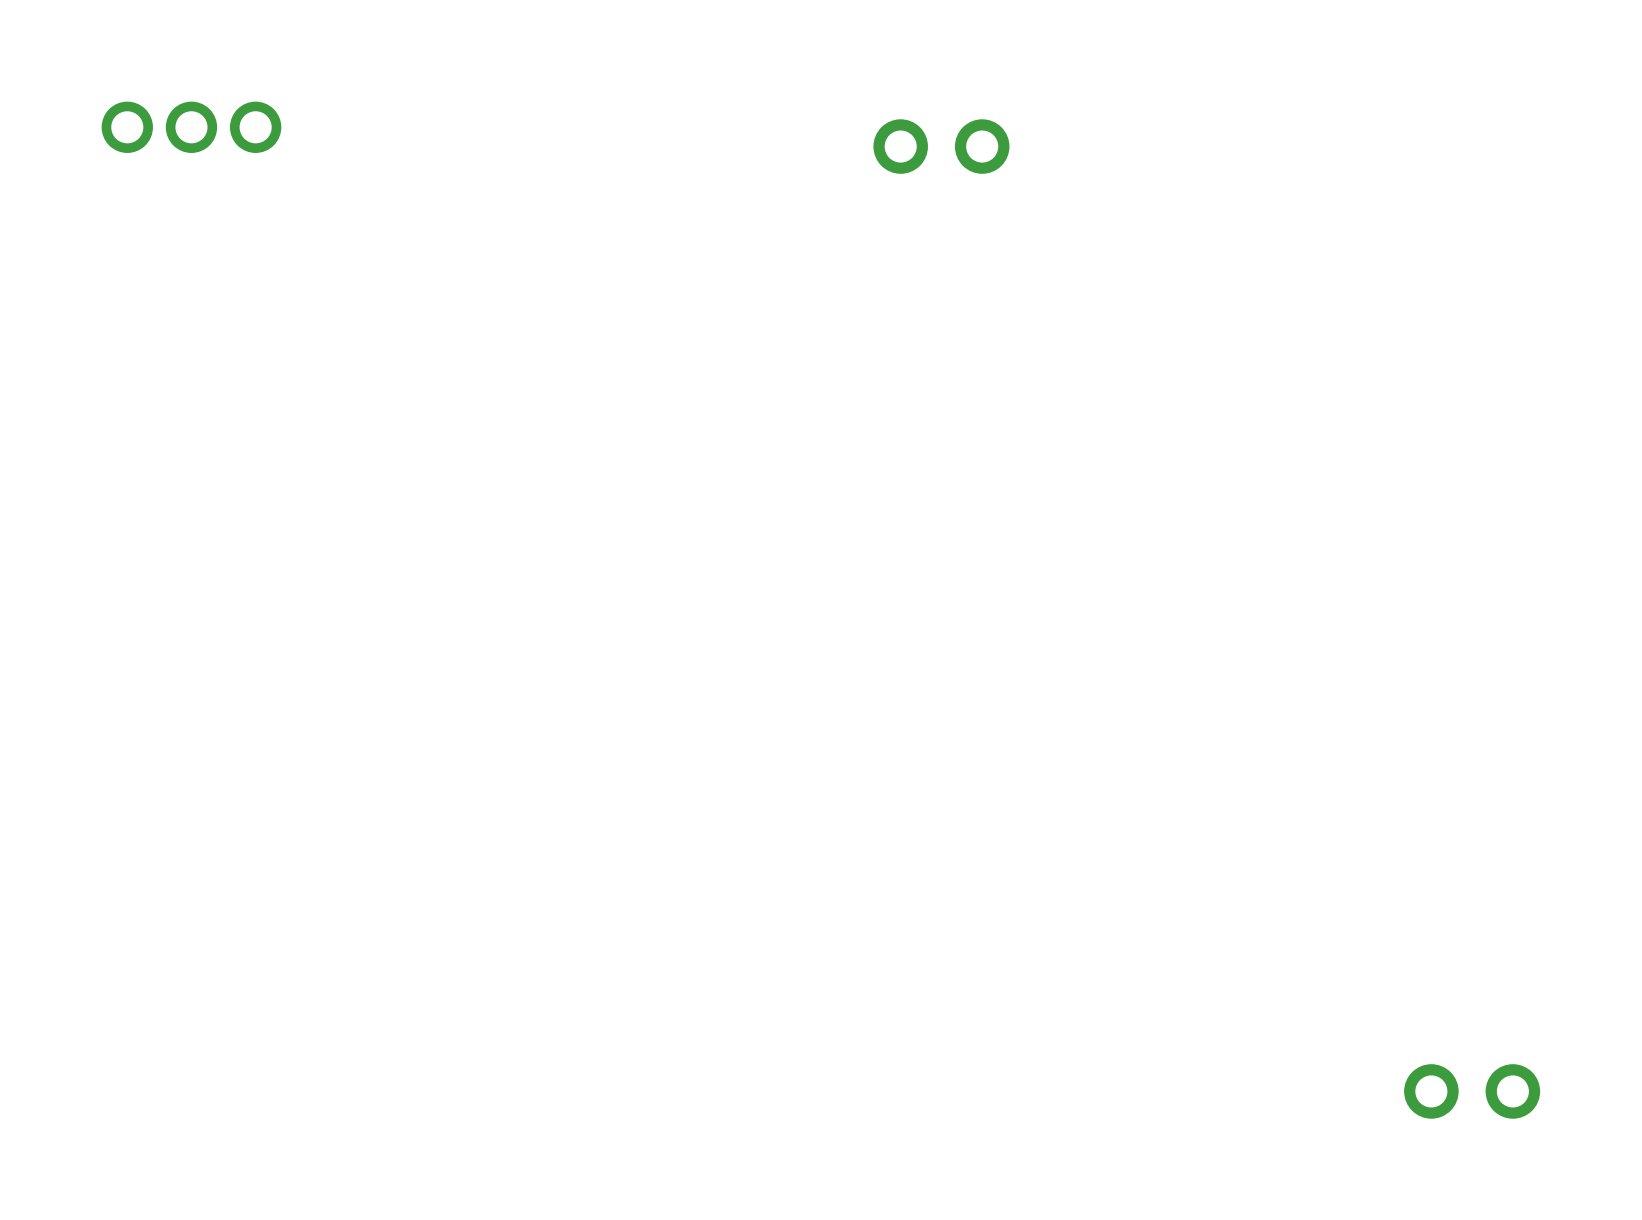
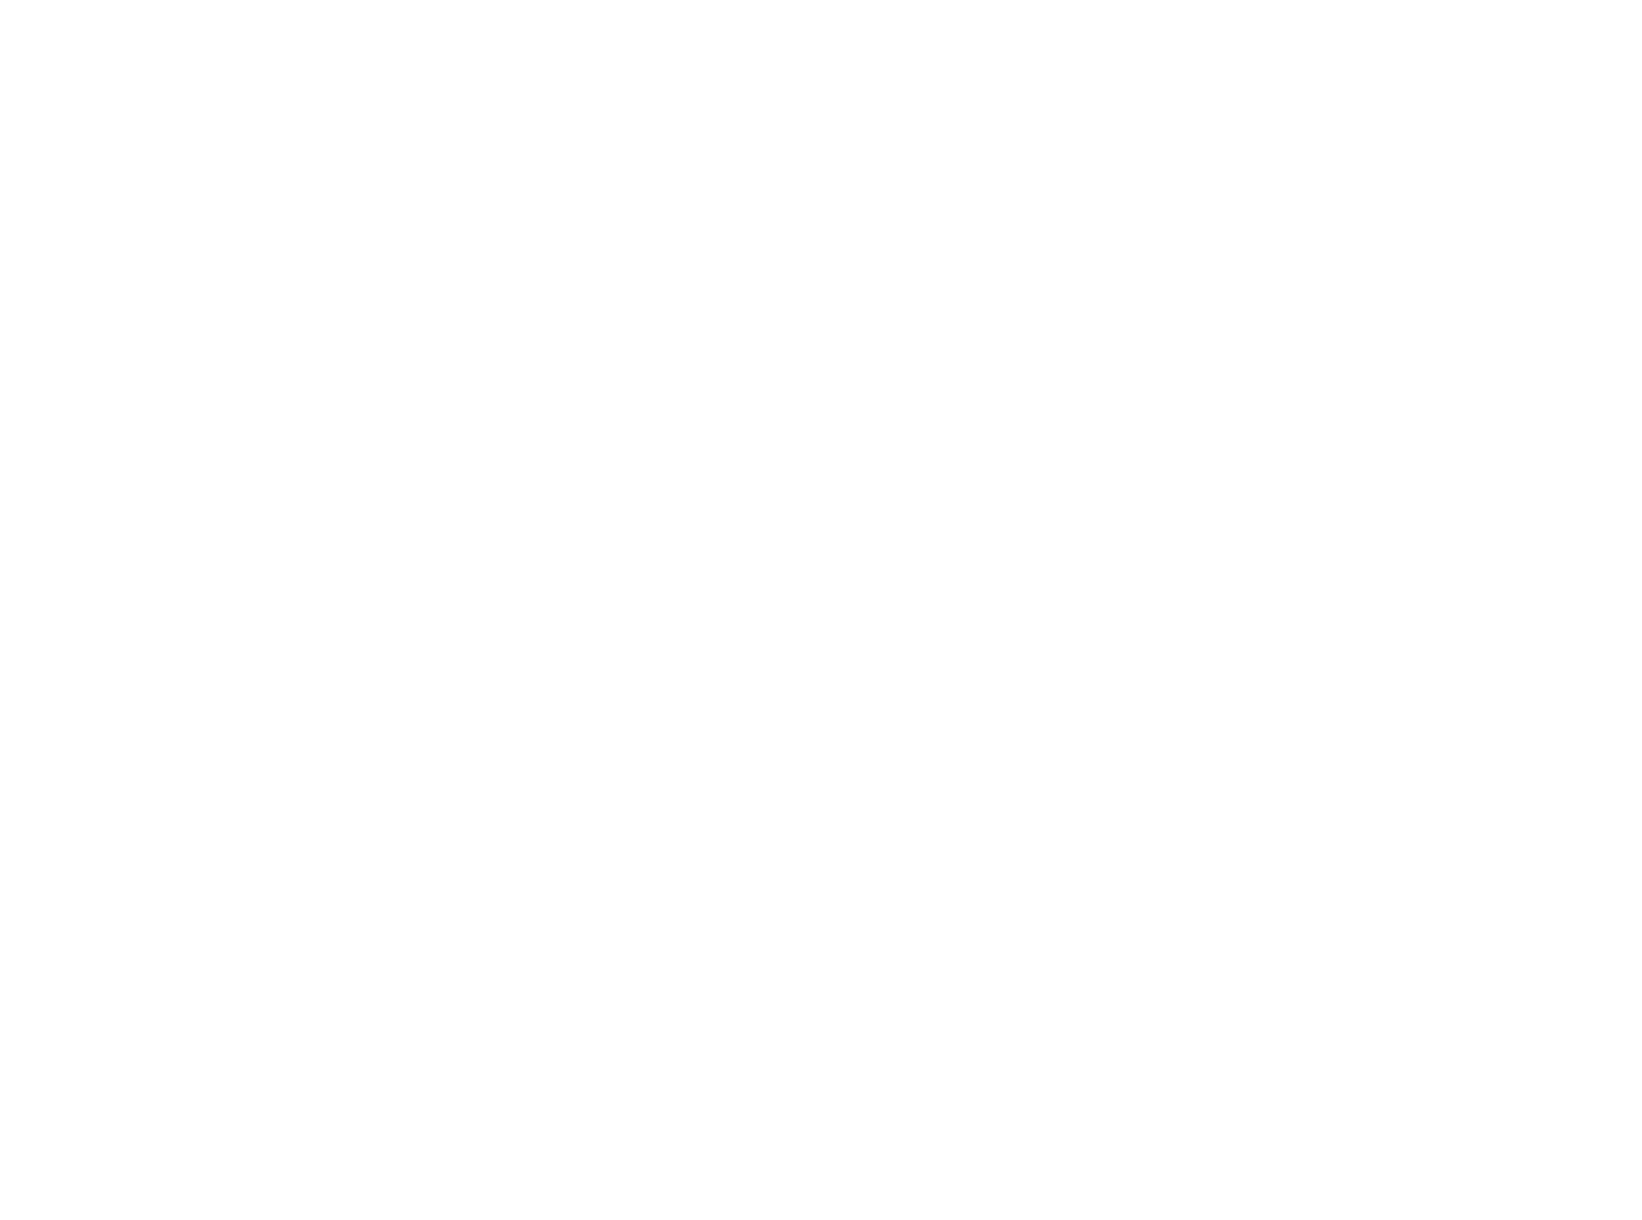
part: (191, 127) -> none
part: (941, 146) -> none
part: (1472, 1091) -> none

